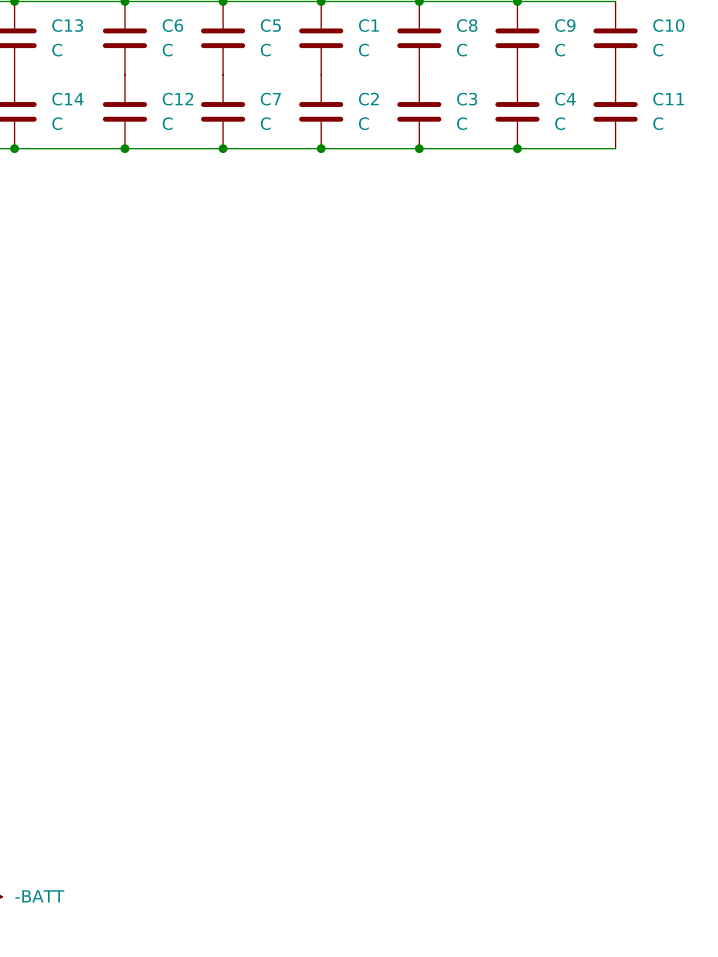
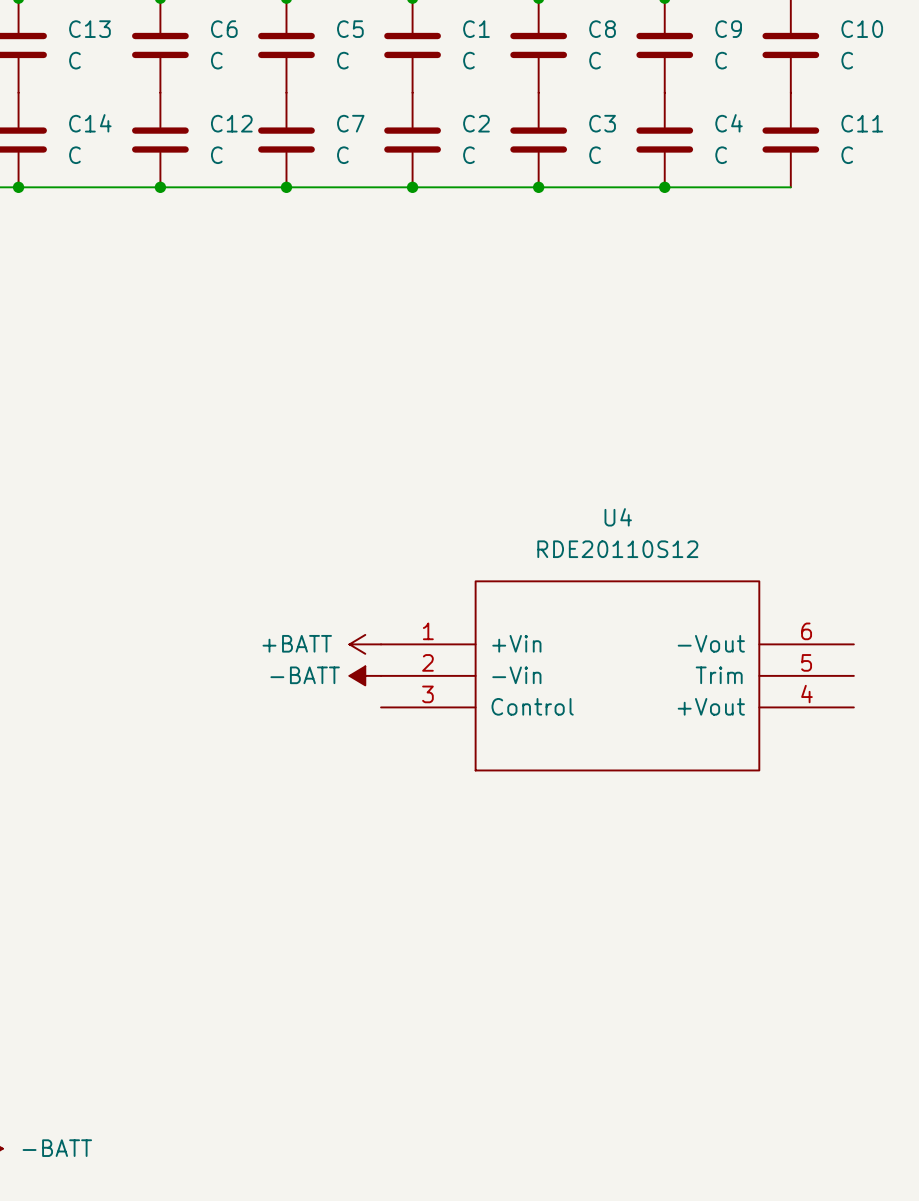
power symbol: none -> +BATT (365, 644)
power symbol: none -> -BATT (365, 675)
U4: none -> RDE20110S12 (617, 675)

